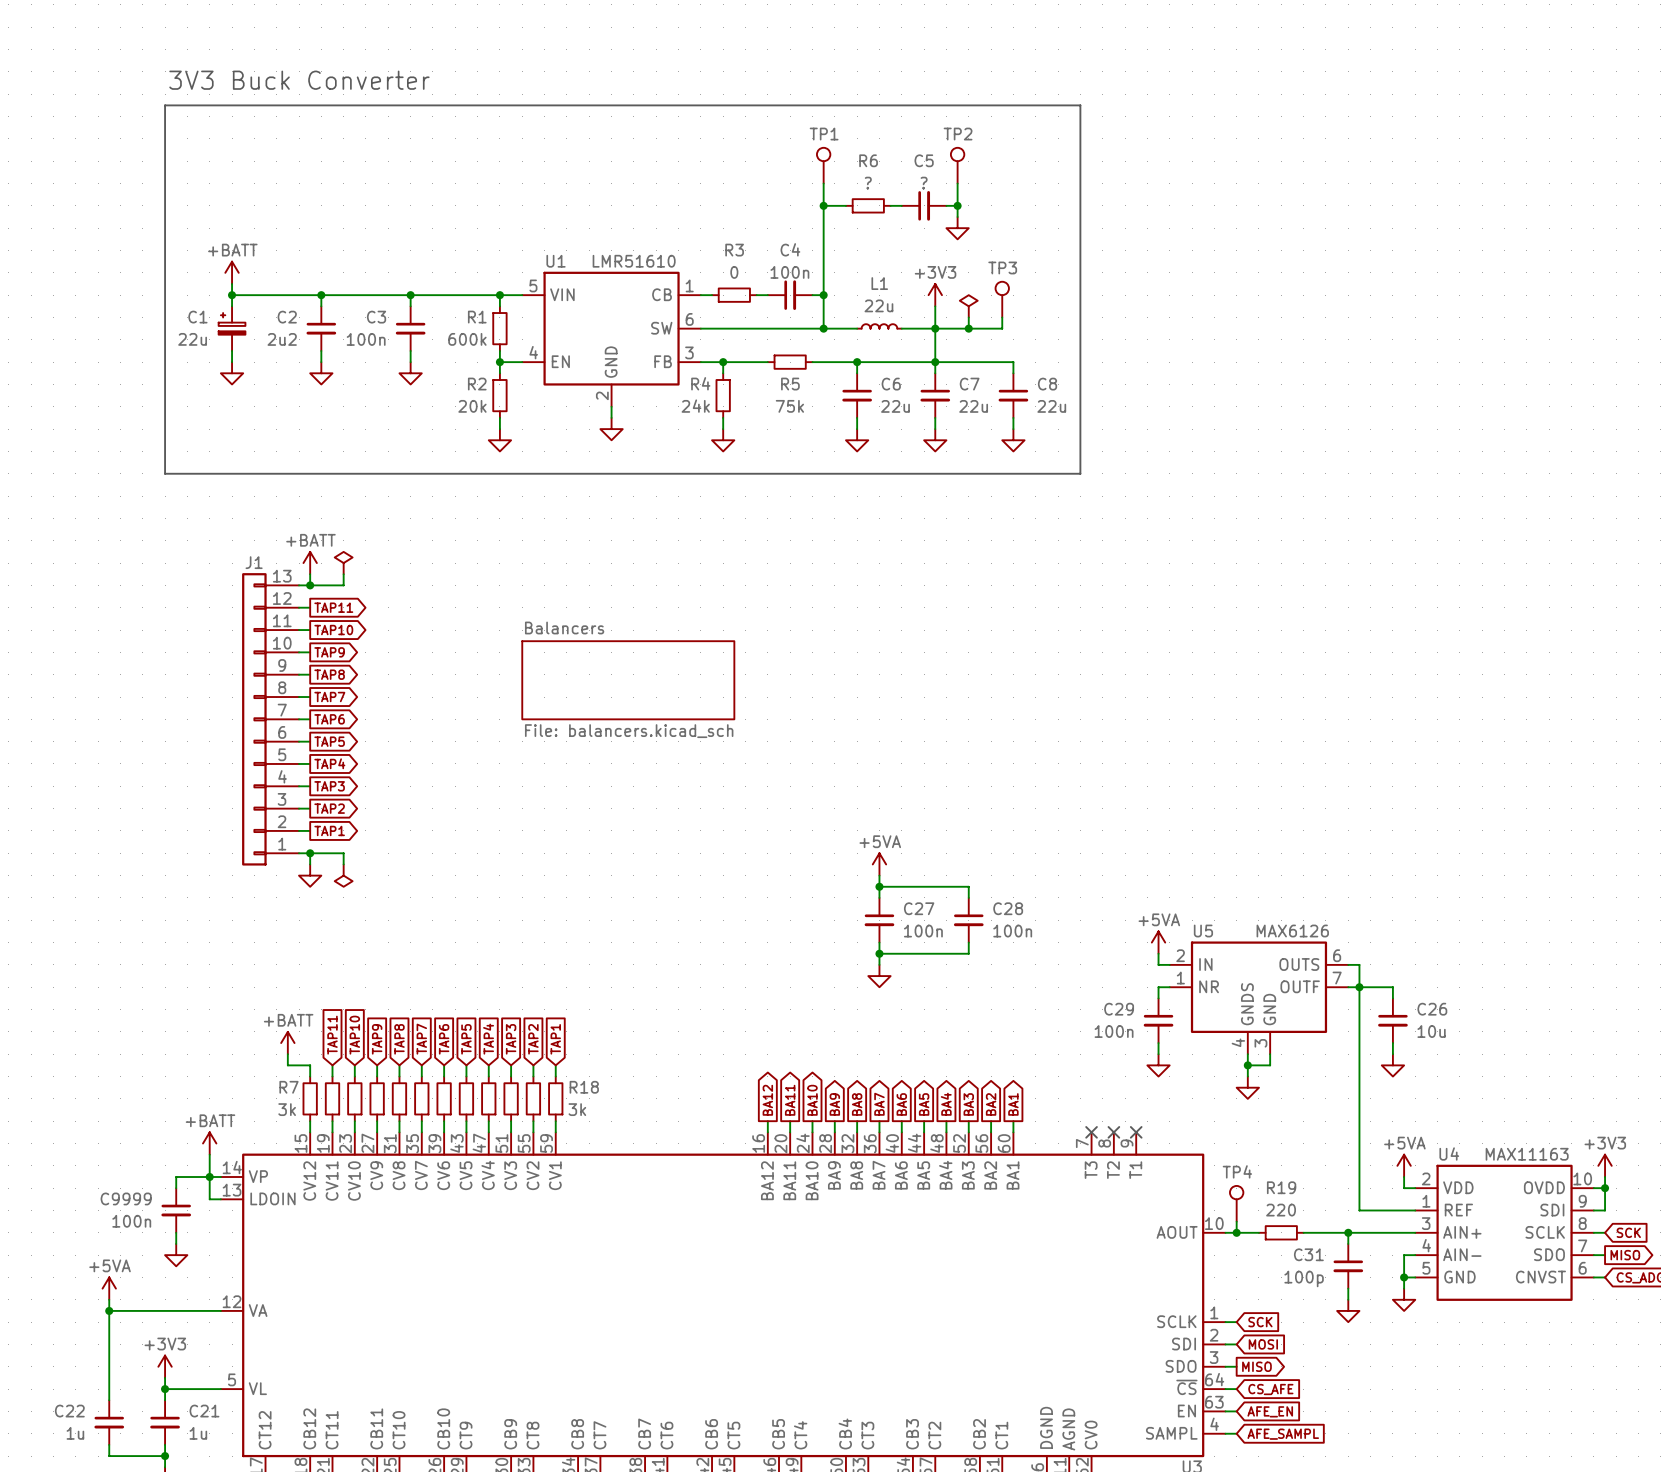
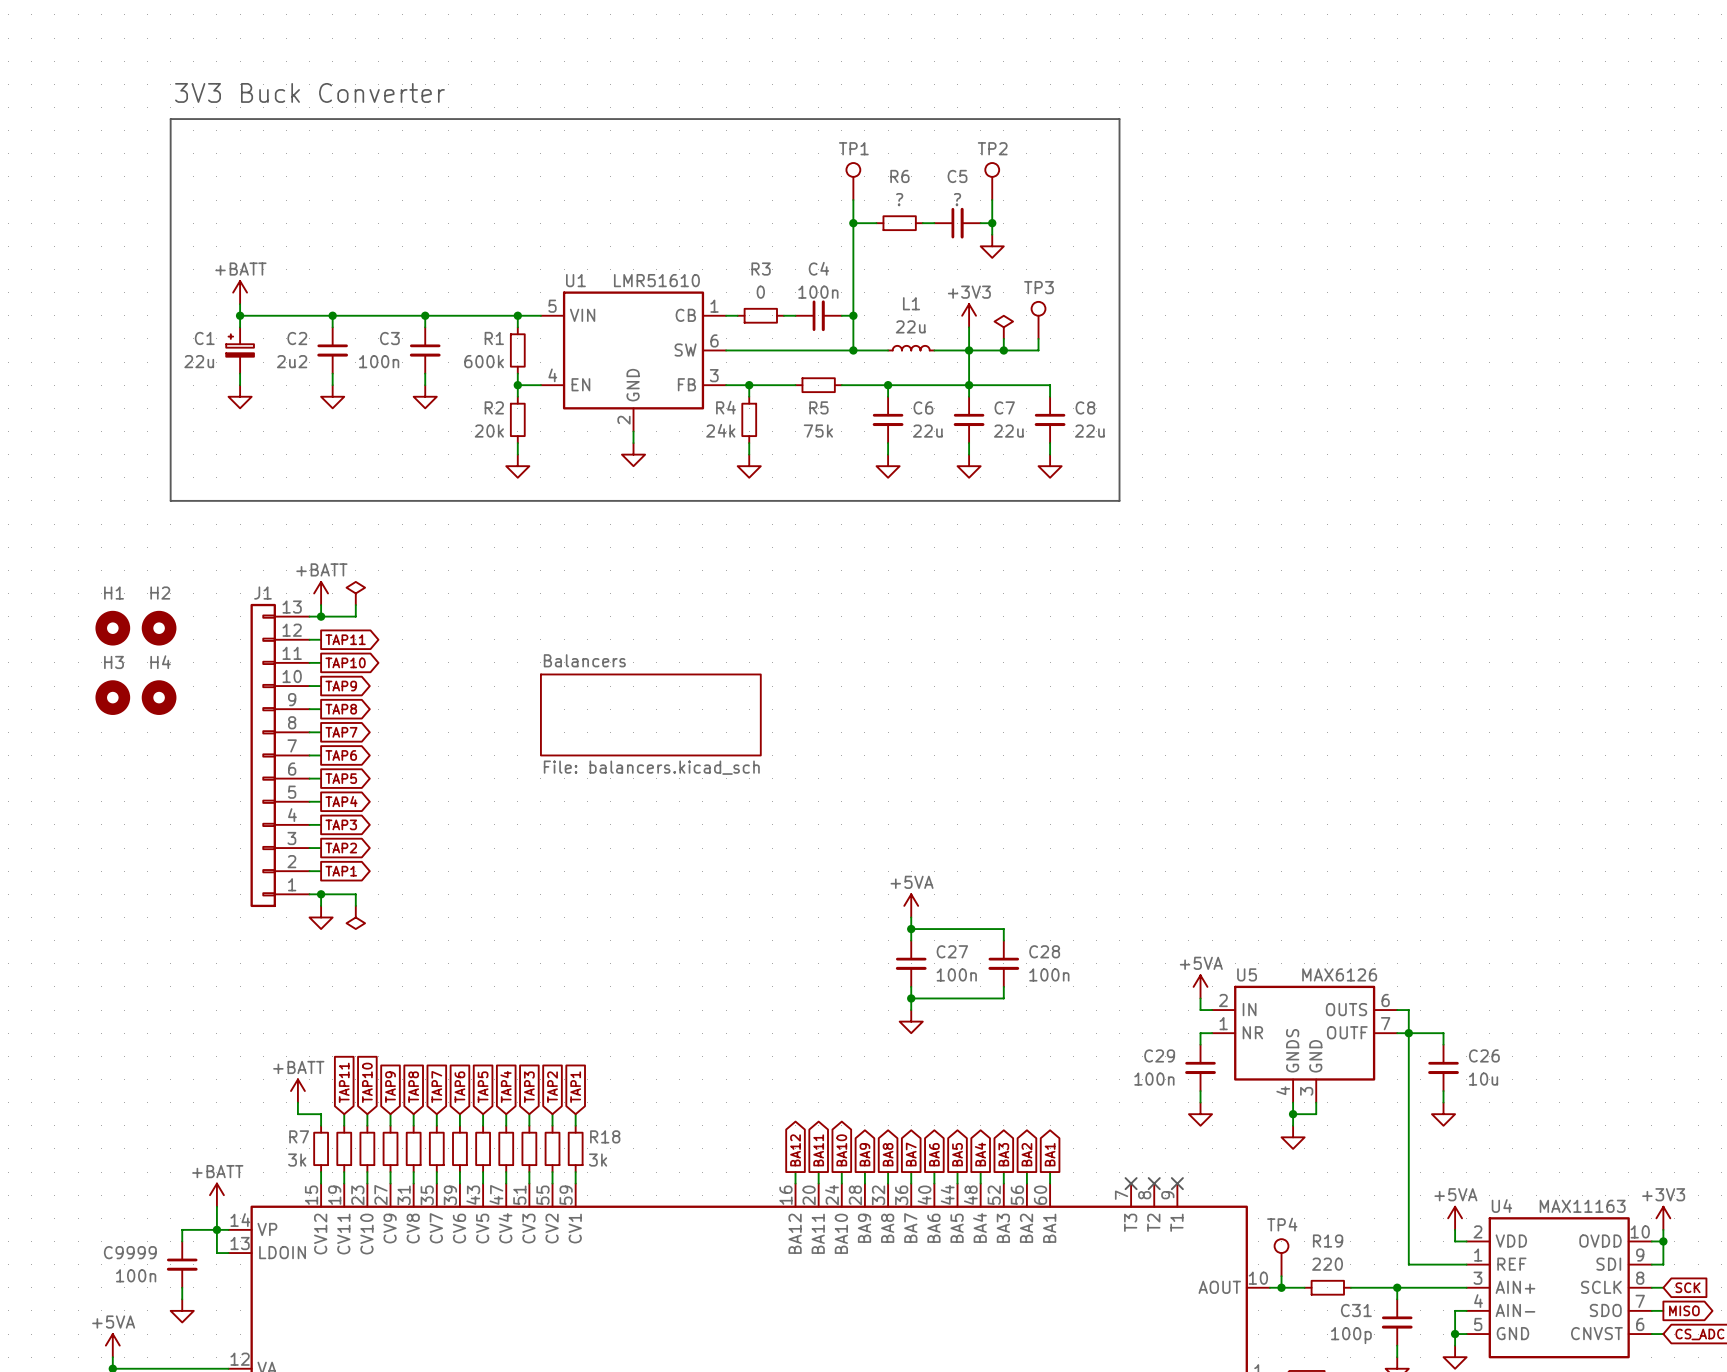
H1: none -> (112, 628)
H2: none -> (159, 628)
H3: none -> (112, 697)
H4: none -> (159, 697)

